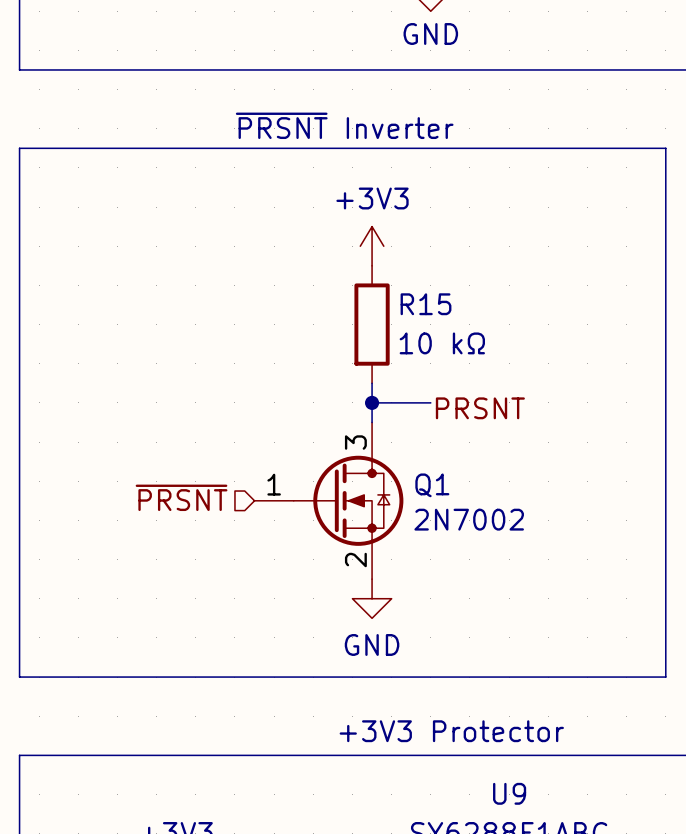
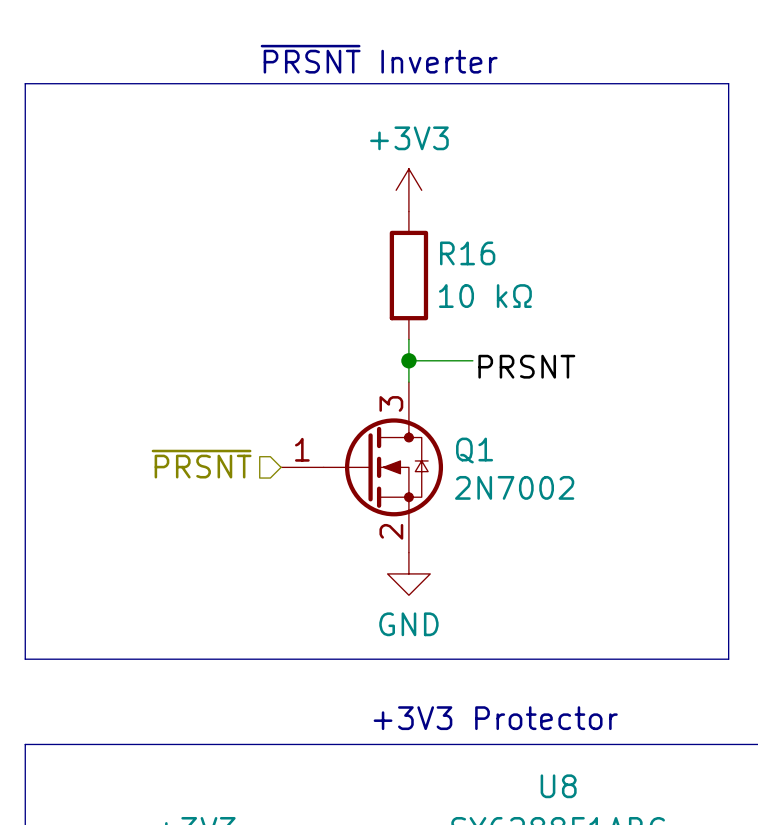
R15 name: R15 (426, 304) -> R16 (467, 253)
U9 name: U9 (509, 793) -> U8 (558, 786)

